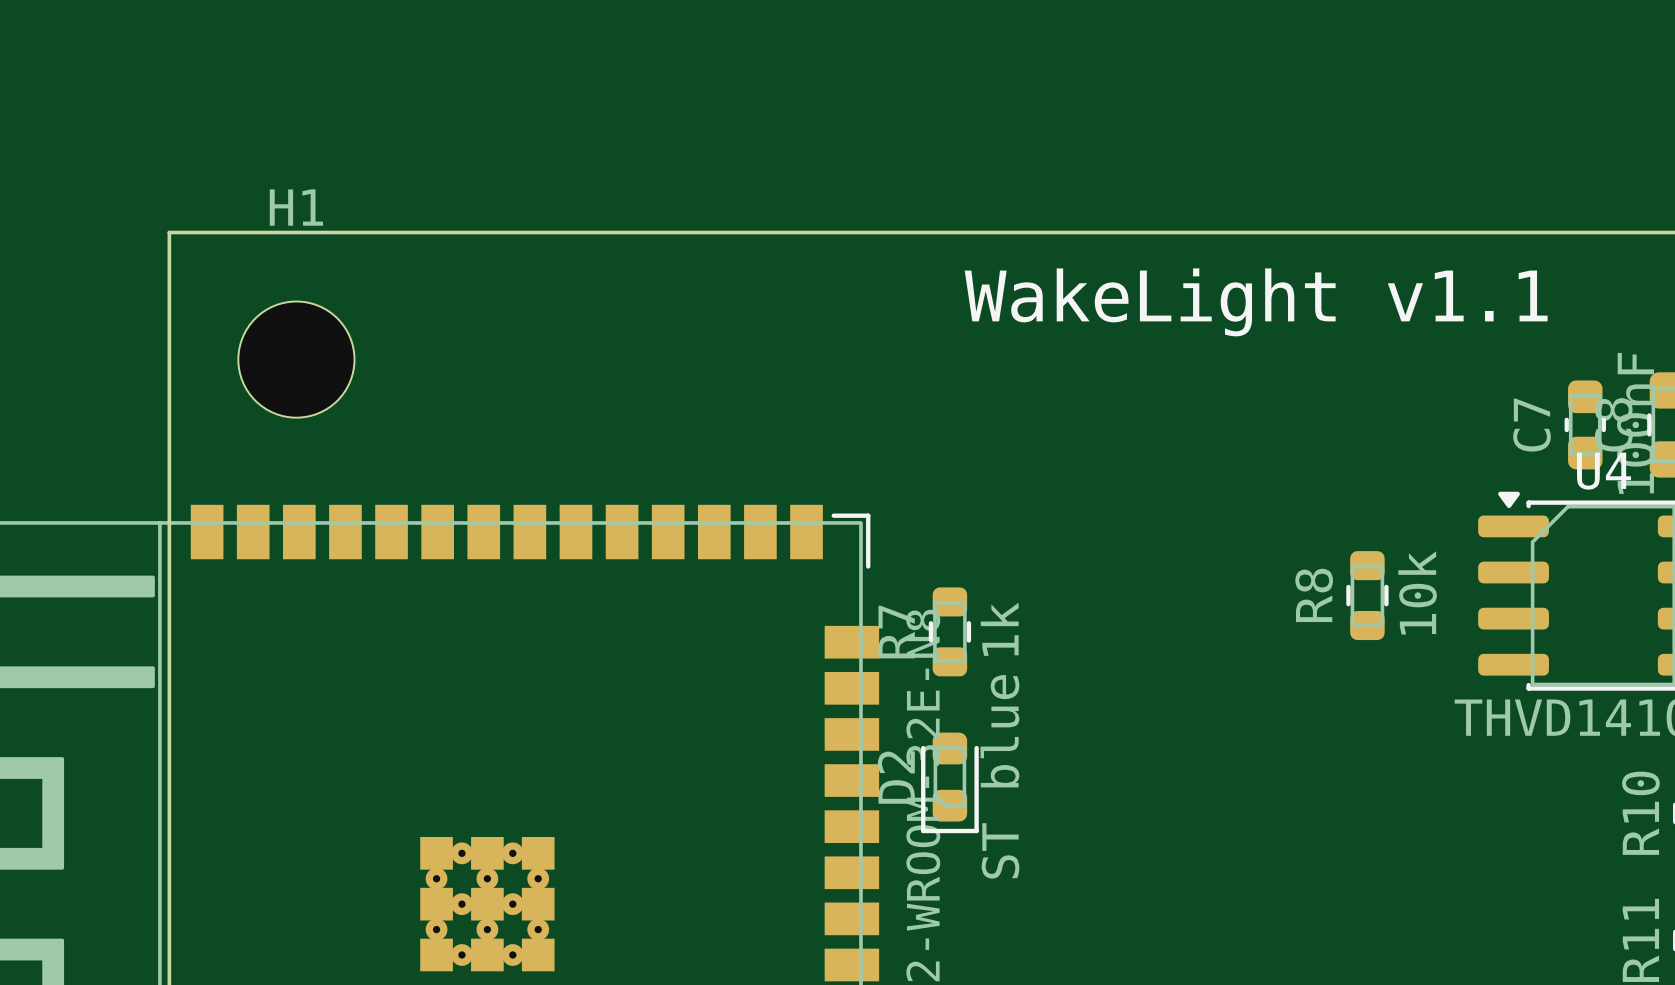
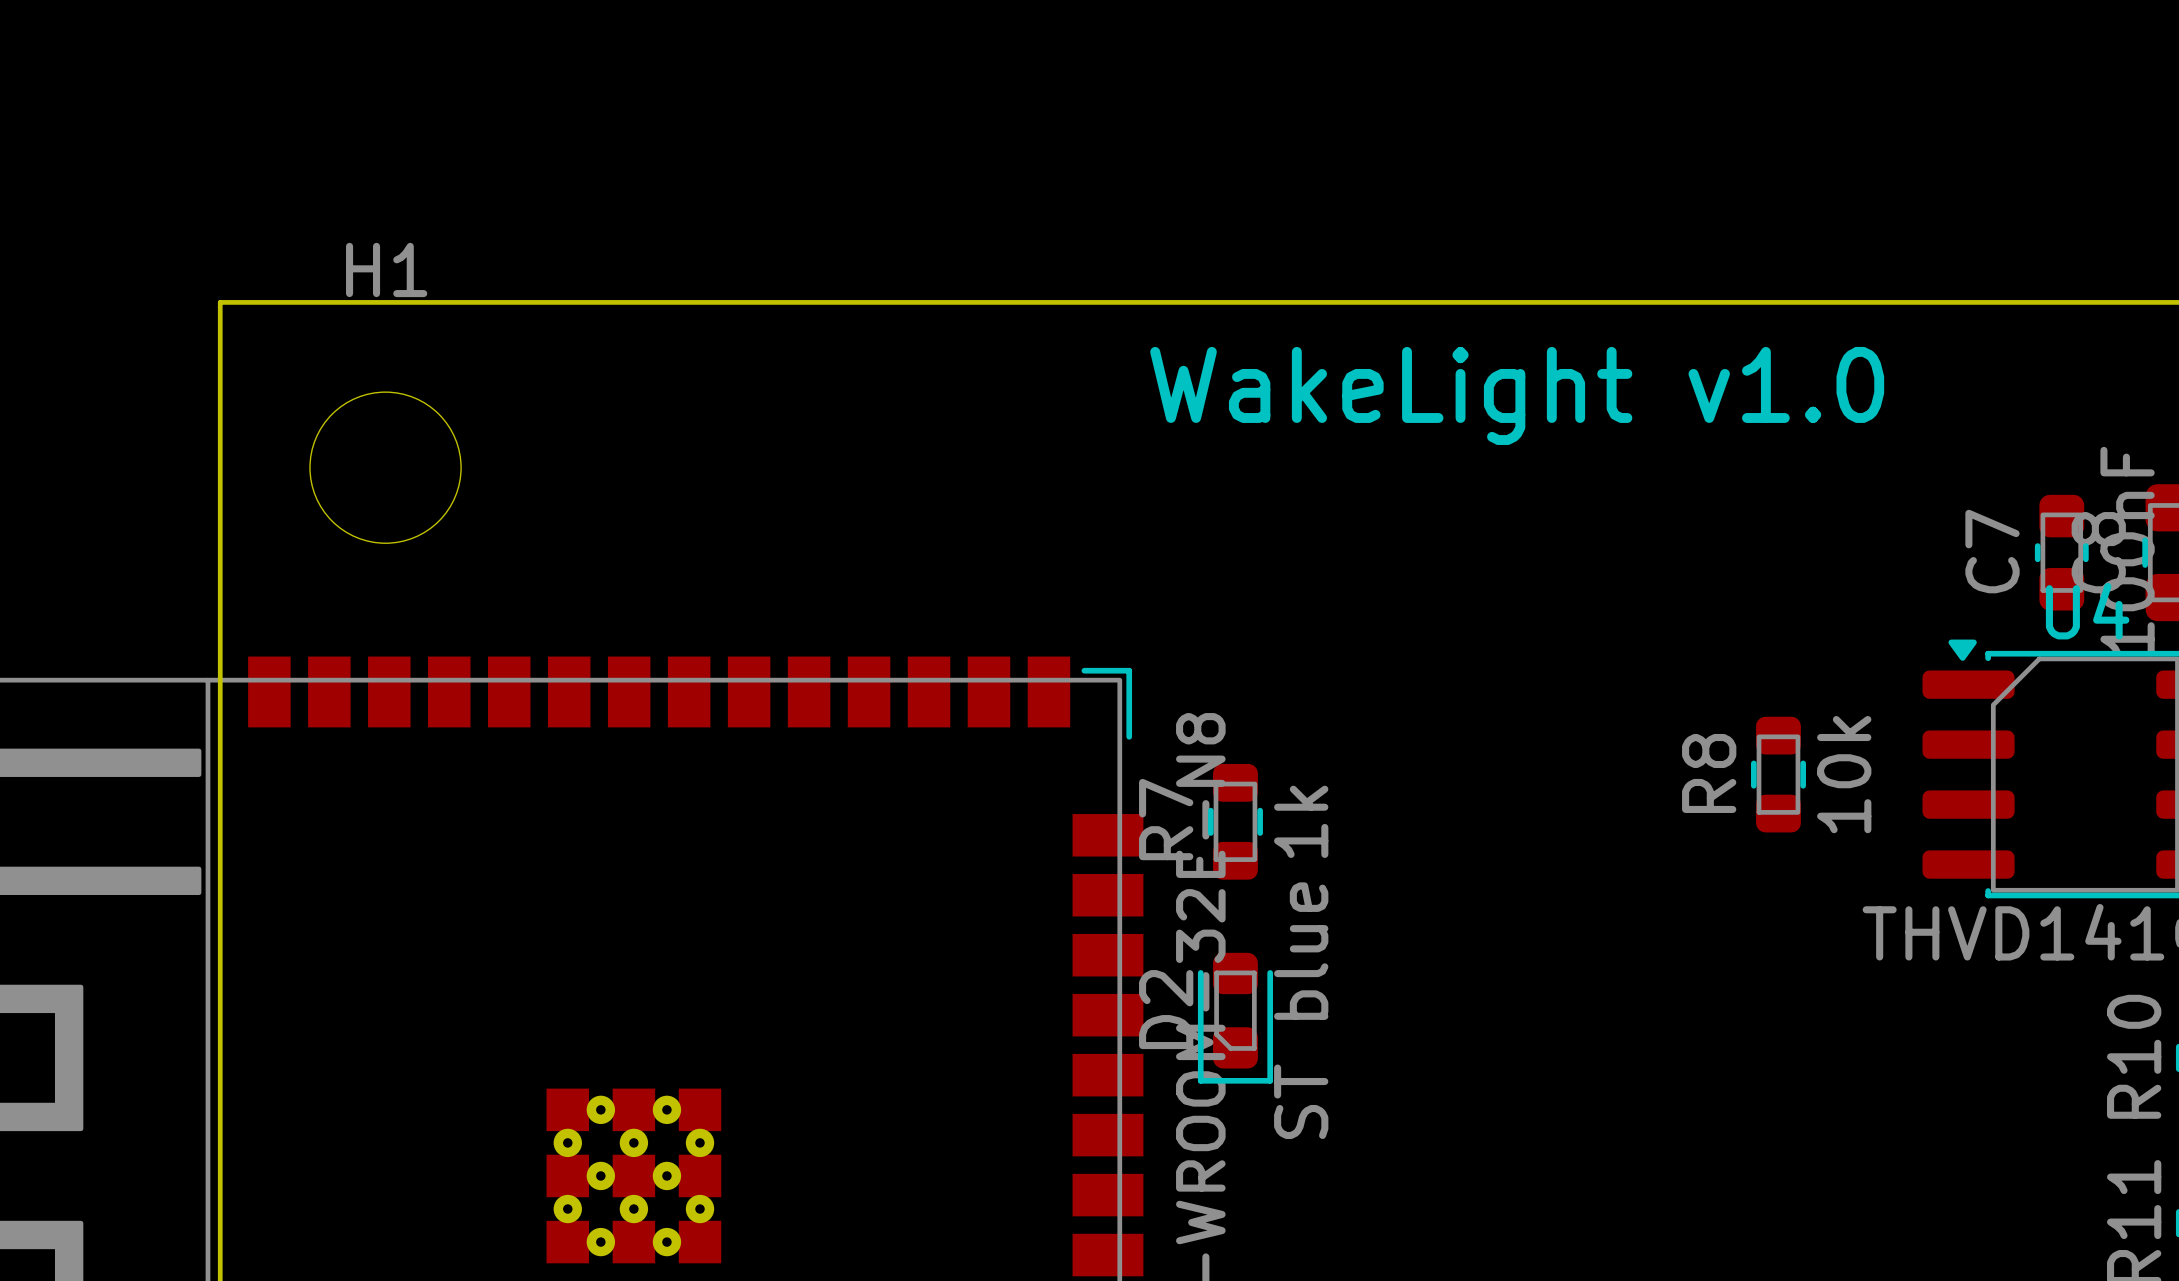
text: WakeLight v1.1 (1256, 302) -> WakeLight v1.0 (1517, 395)

